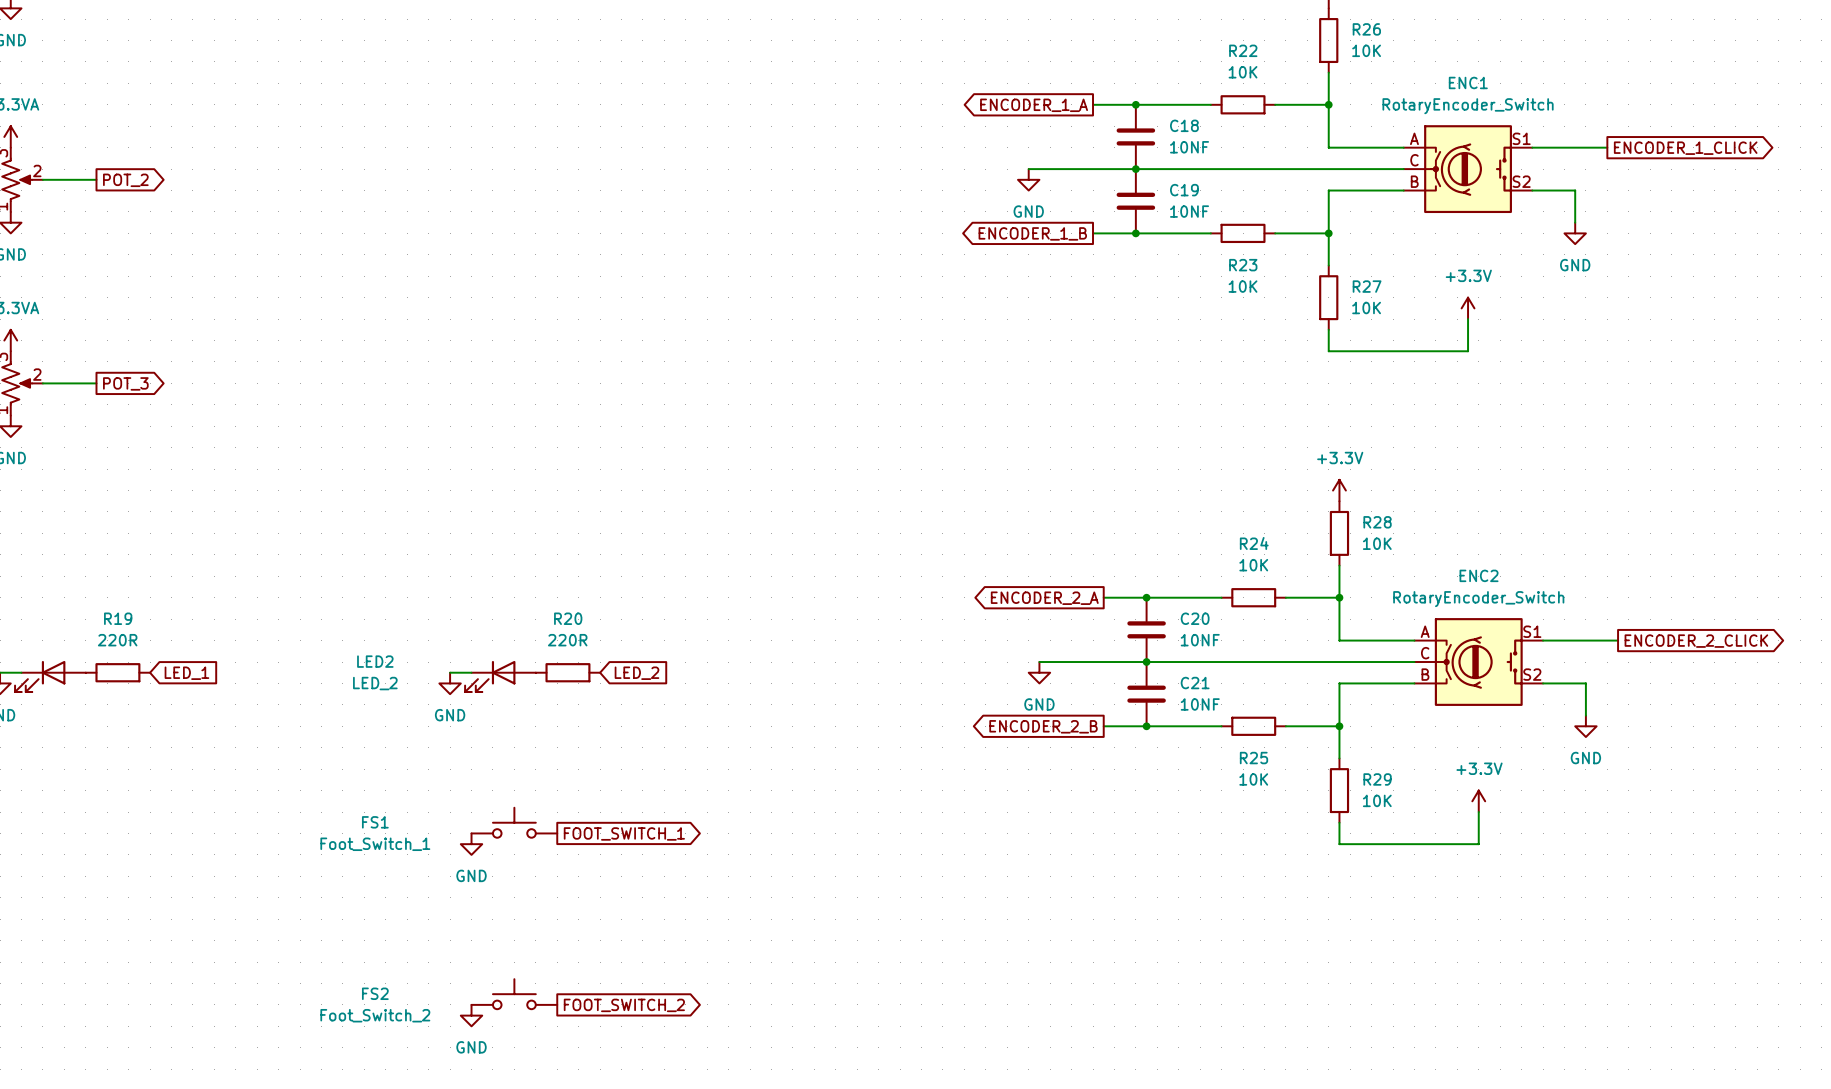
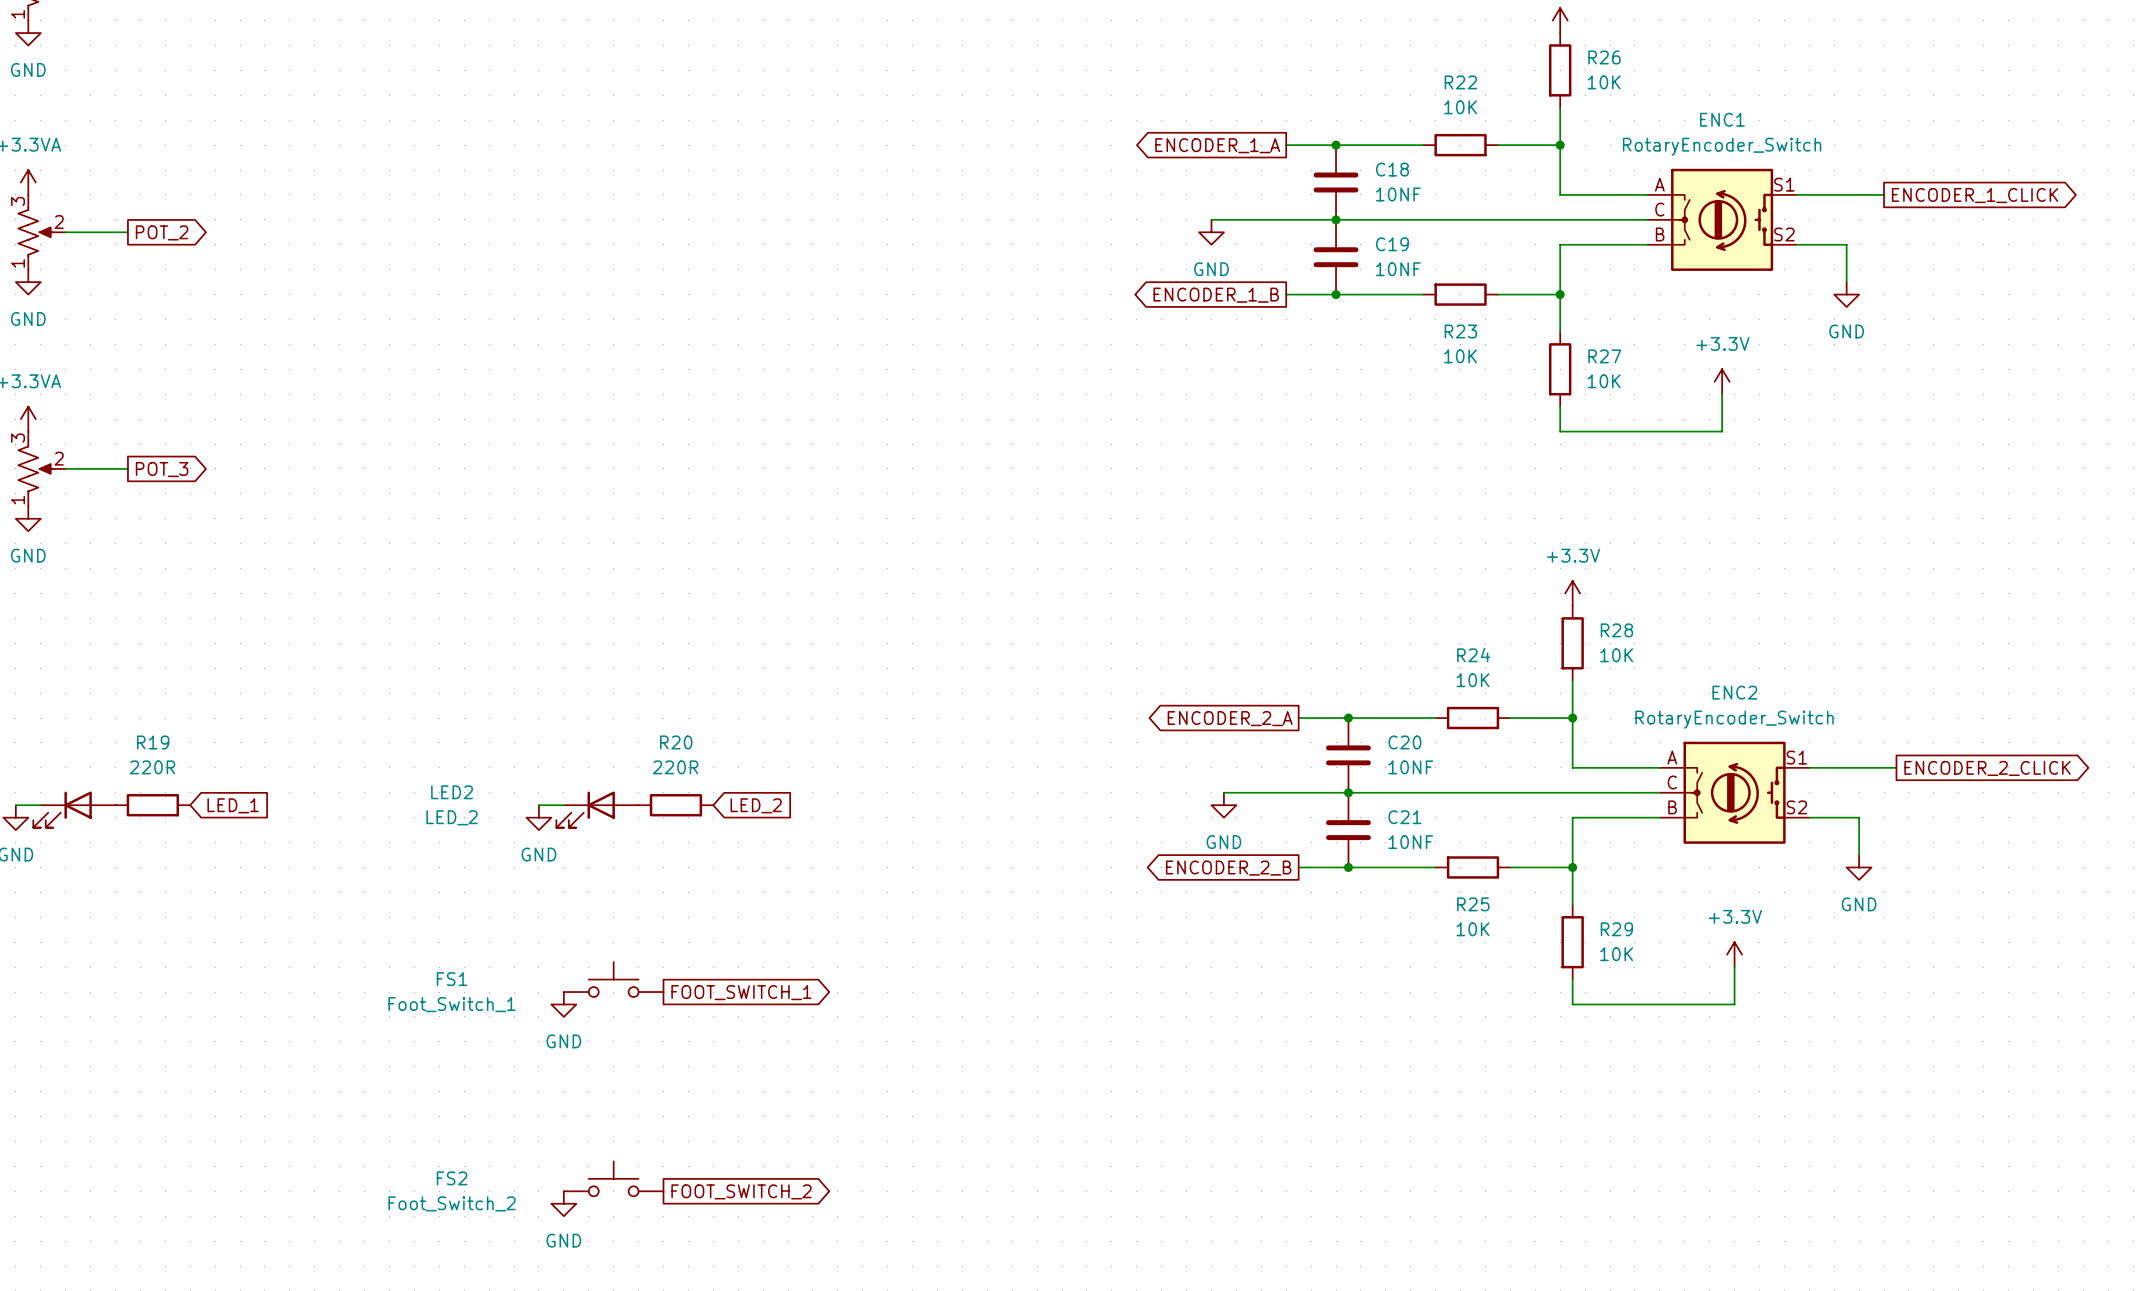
ENC1 symbol: [1403, 125, 1533, 214] -> [1647, 168, 1797, 271]
ENC2 symbol: [1414, 618, 1544, 706] -> [1659, 741, 1810, 844]

